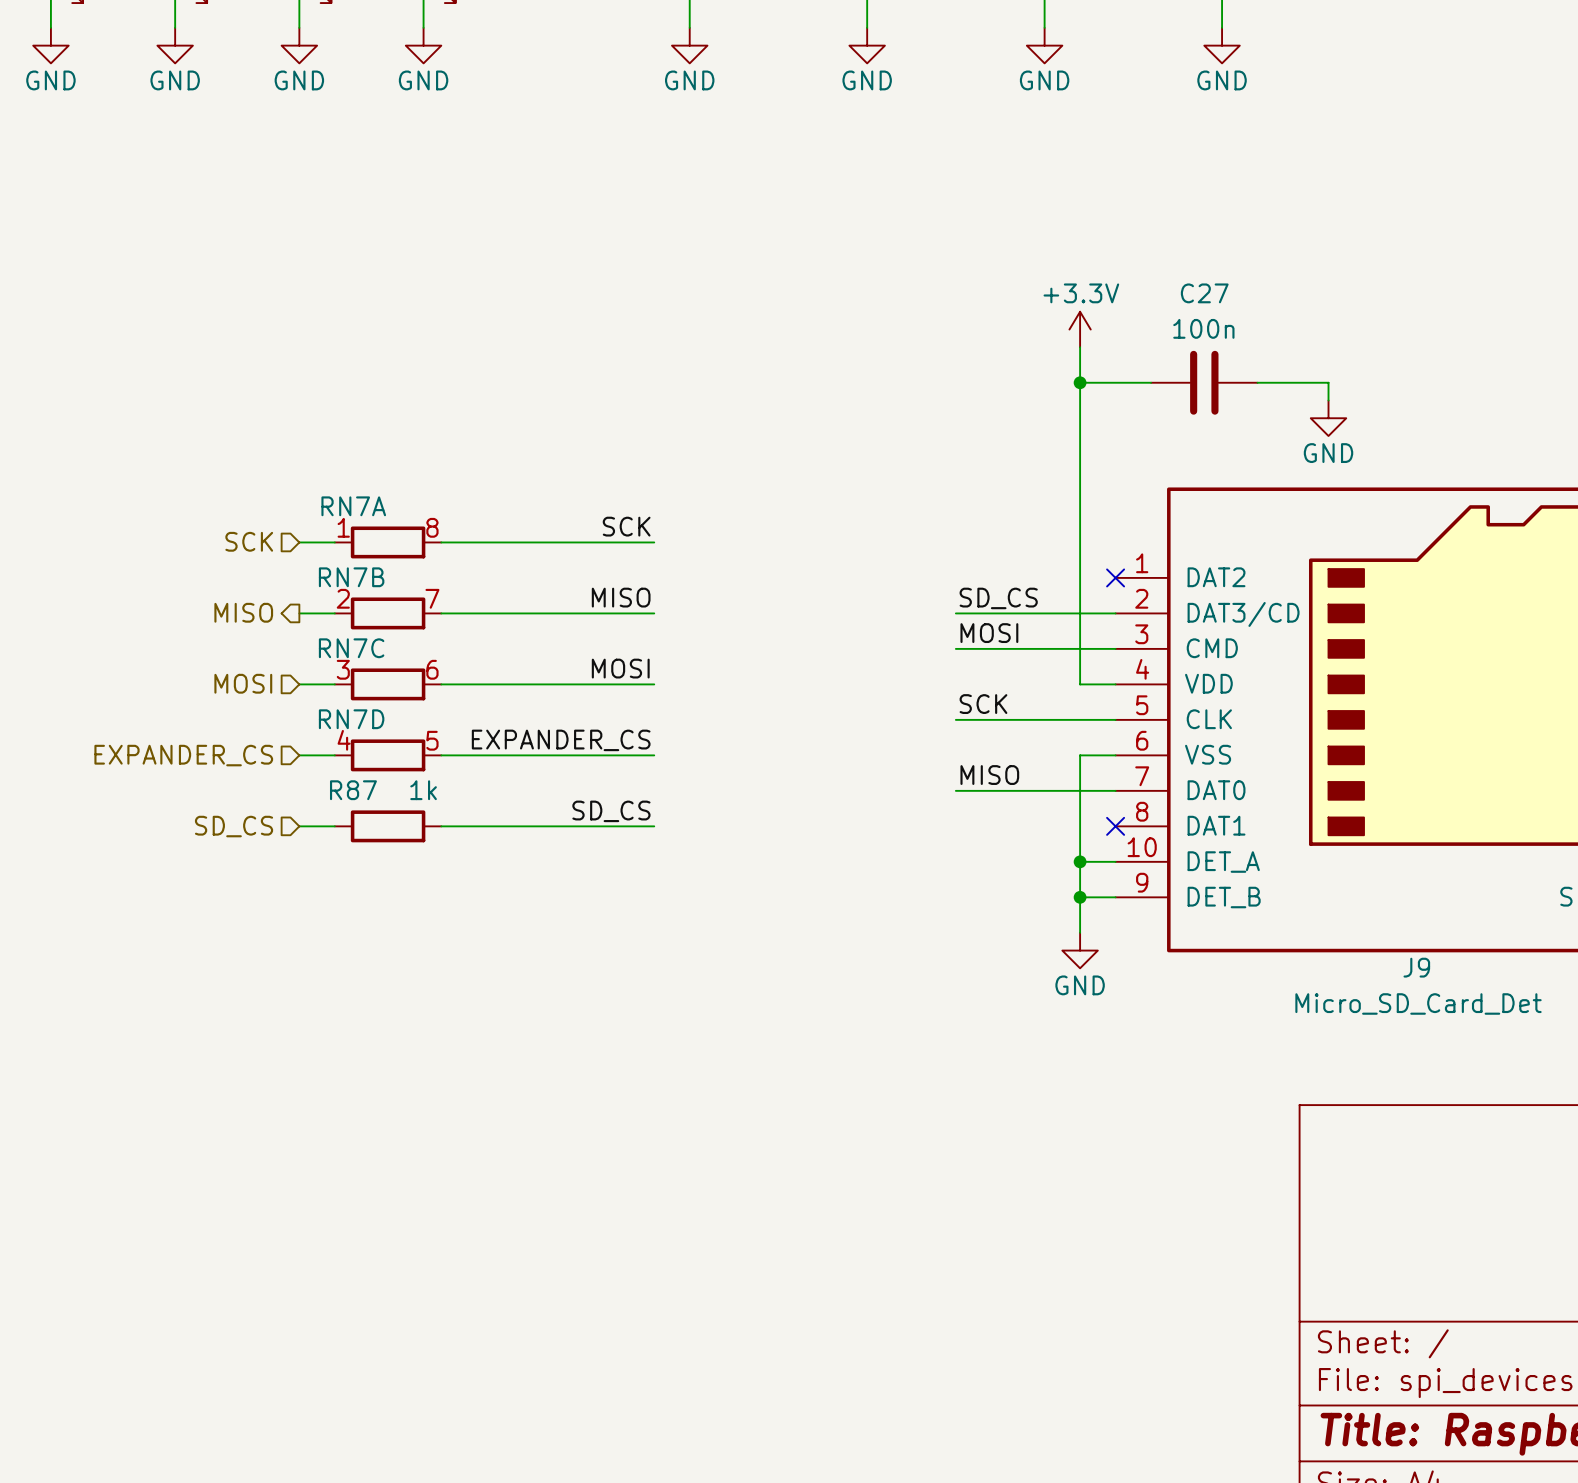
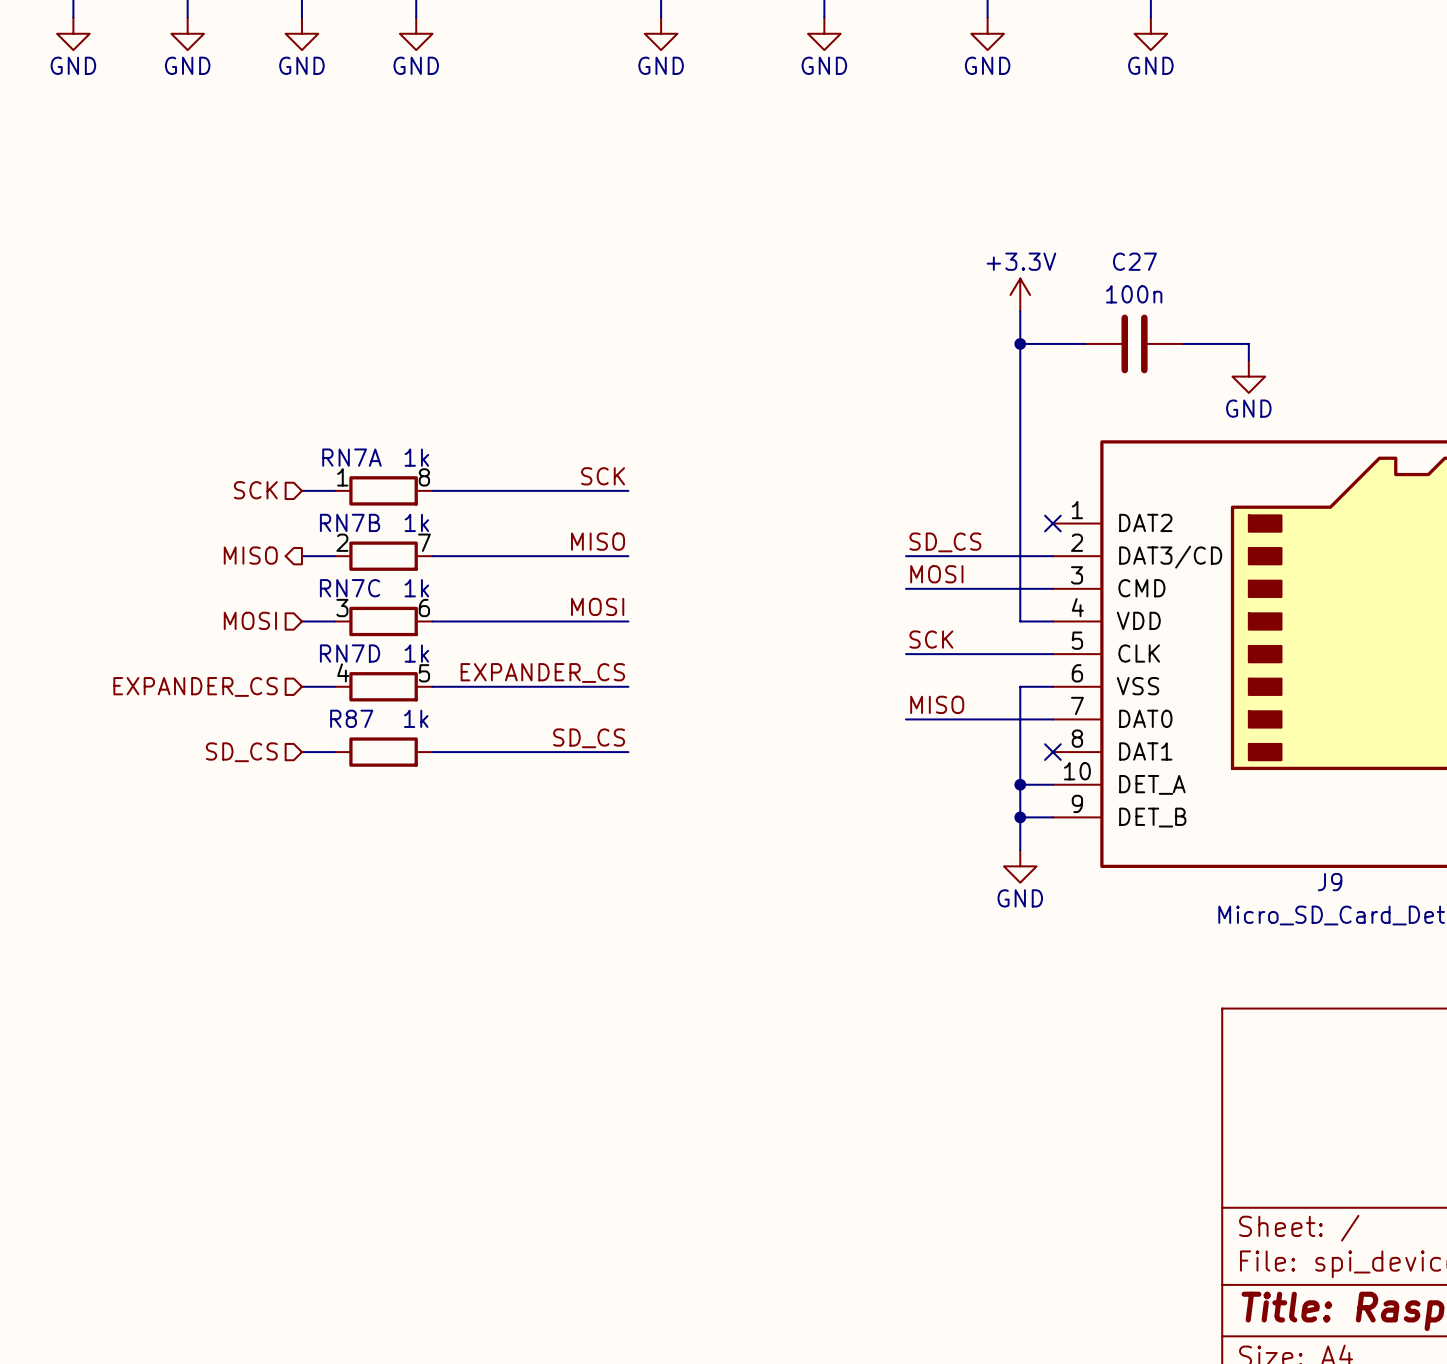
RN7A value: none -> 1k (416, 457)
RN7B value: none -> 1k (416, 522)
RN7C value: none -> 1k (416, 588)
RN7D value: none -> 1k (416, 653)

